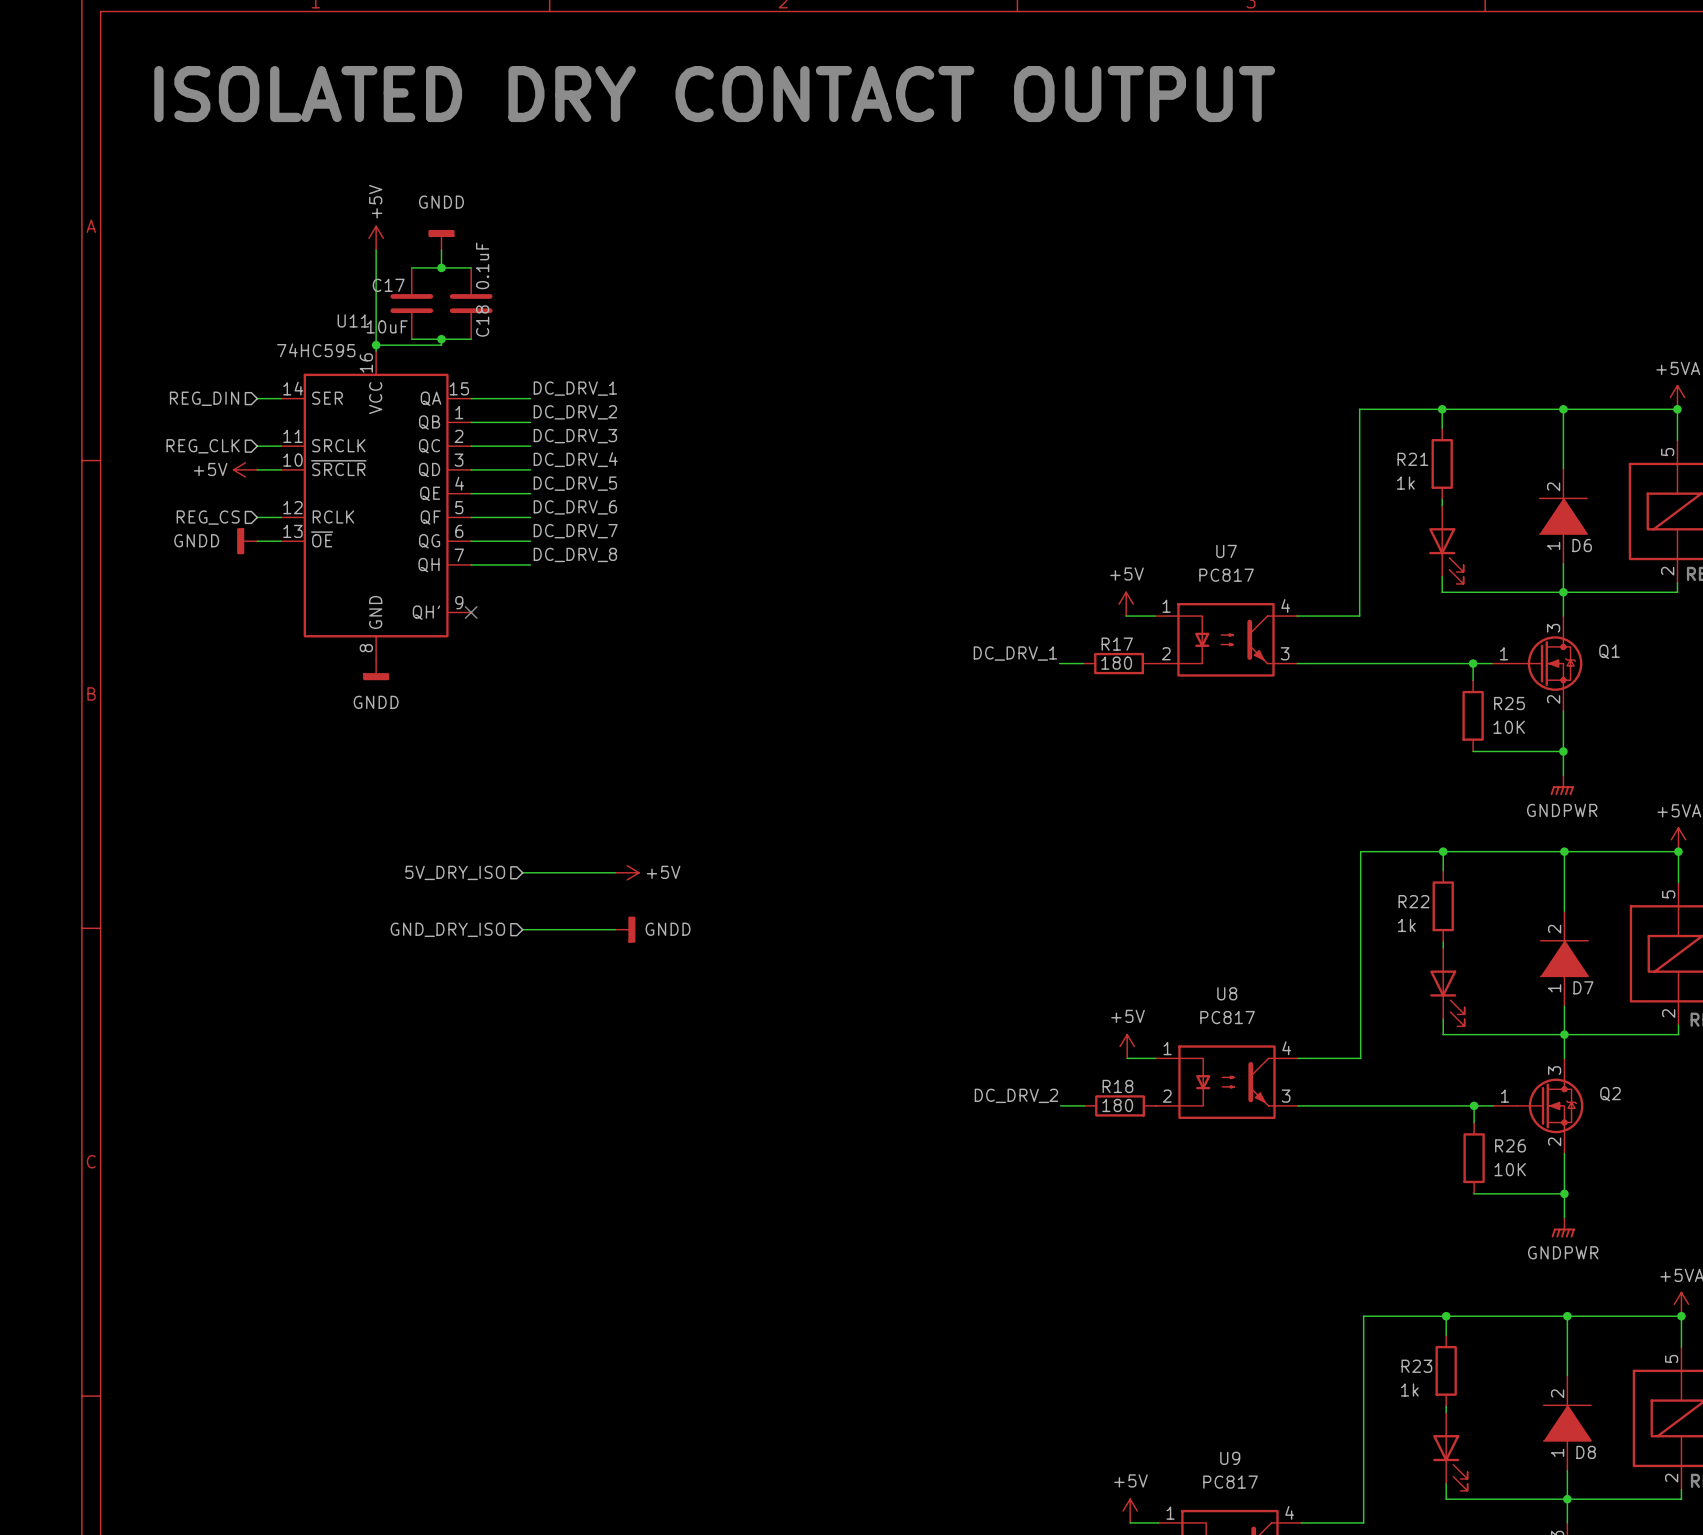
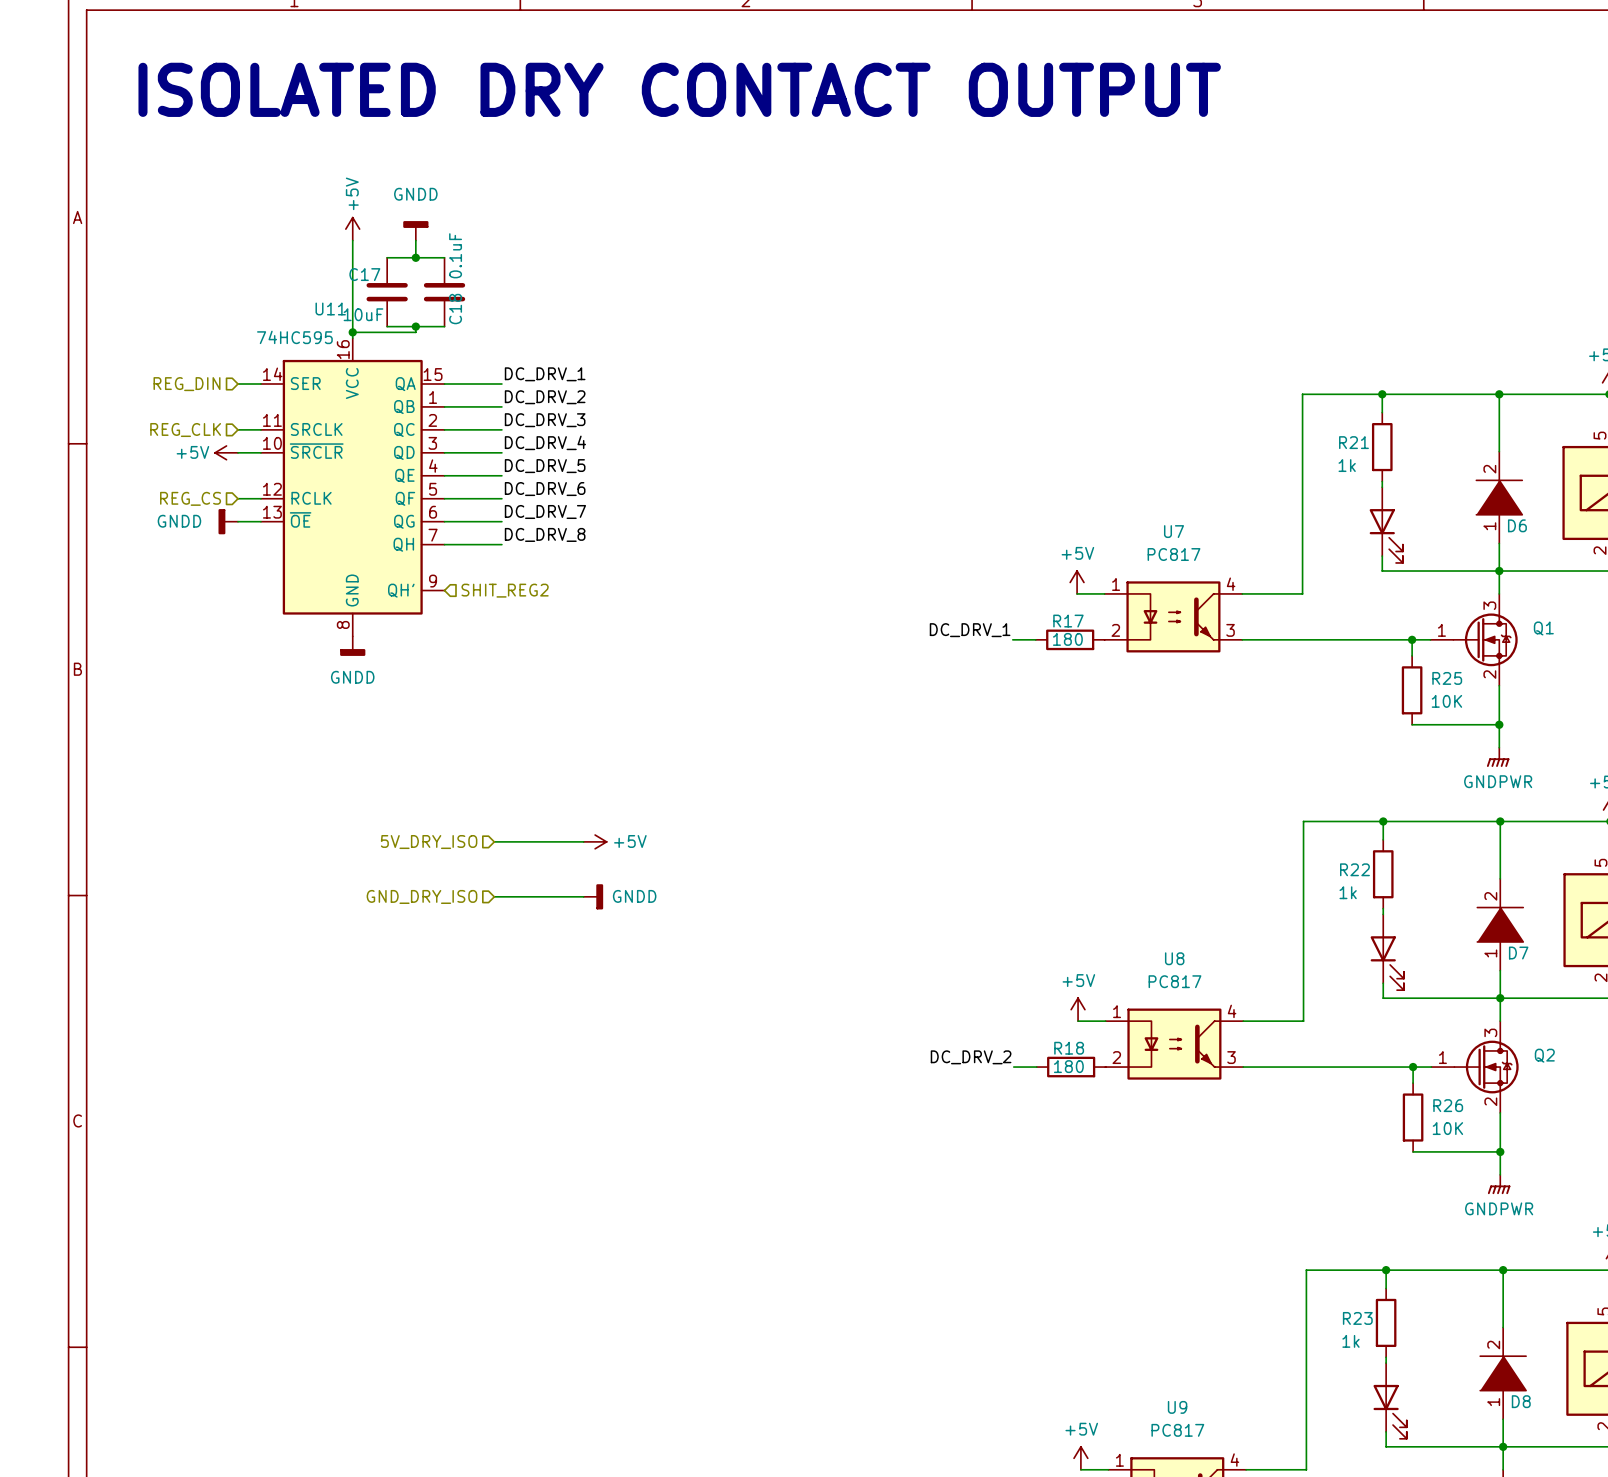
no-connect mark: (471, 612) -> none
hierarchical label: none -> SHIT_REG2 (505, 590)

